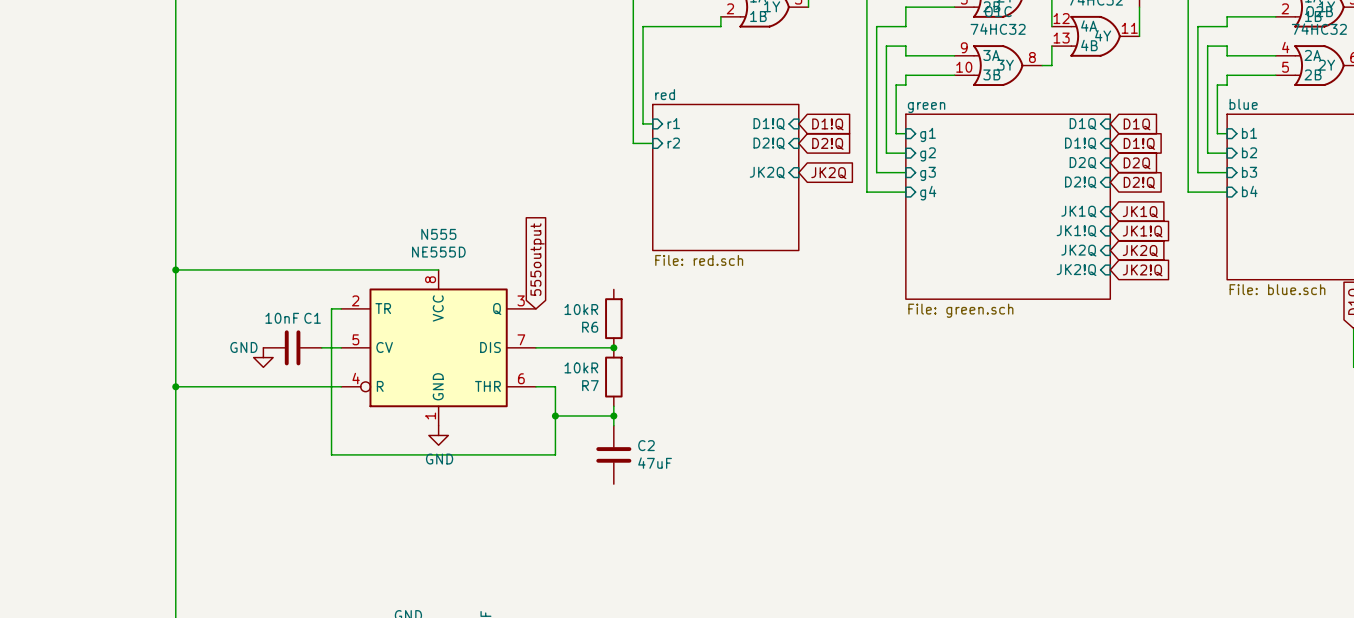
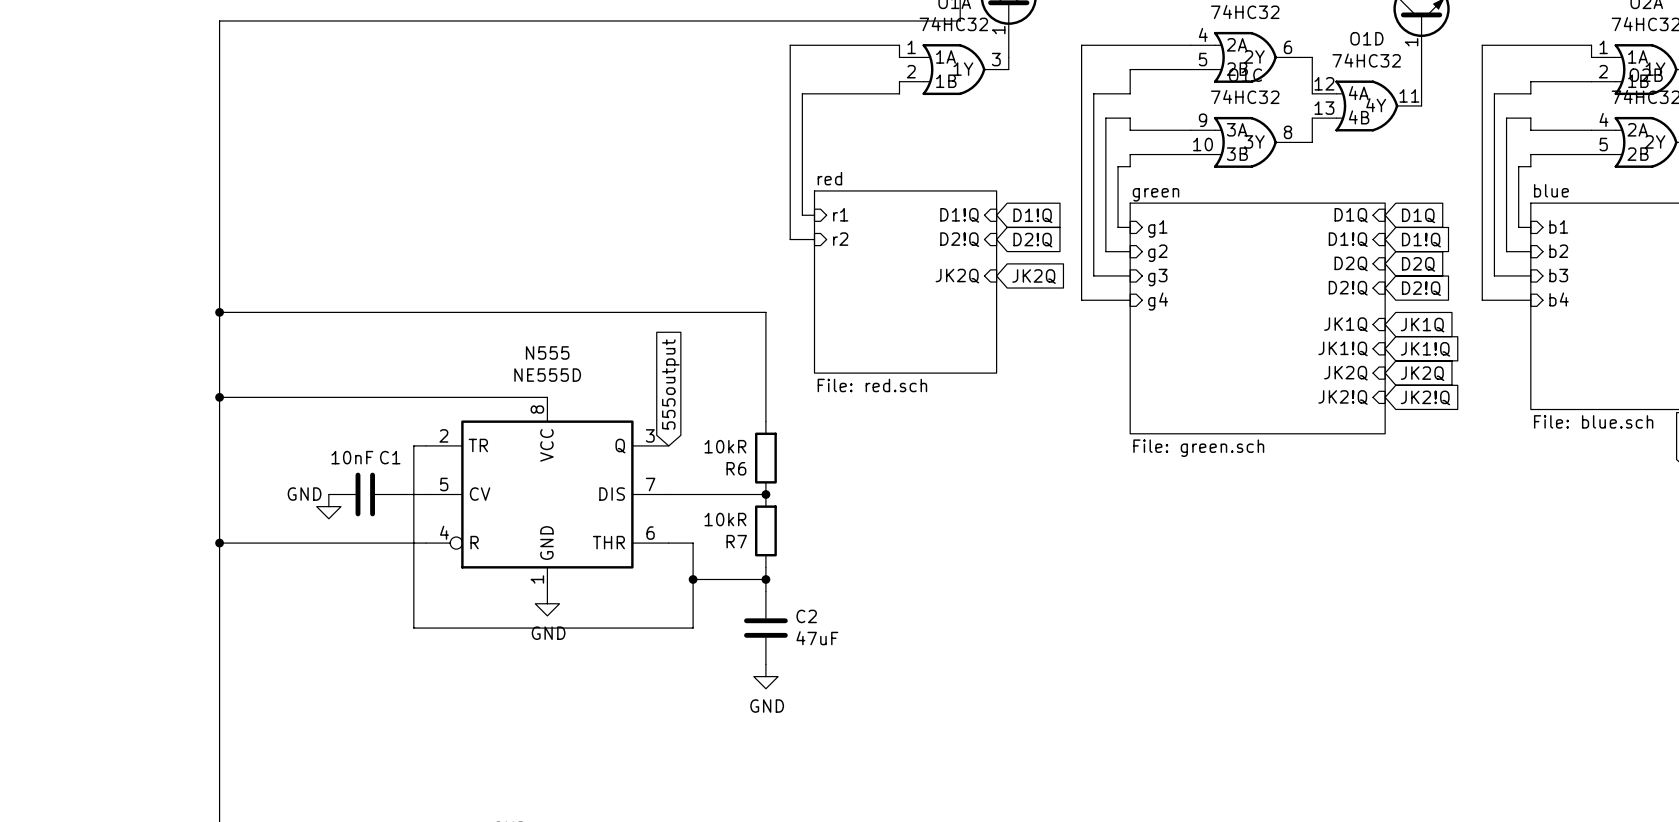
wire: none -> (219, 312) (765, 312) (765, 421)
junction: none -> (219, 312)
power symbol: none -> GND (765, 676)

